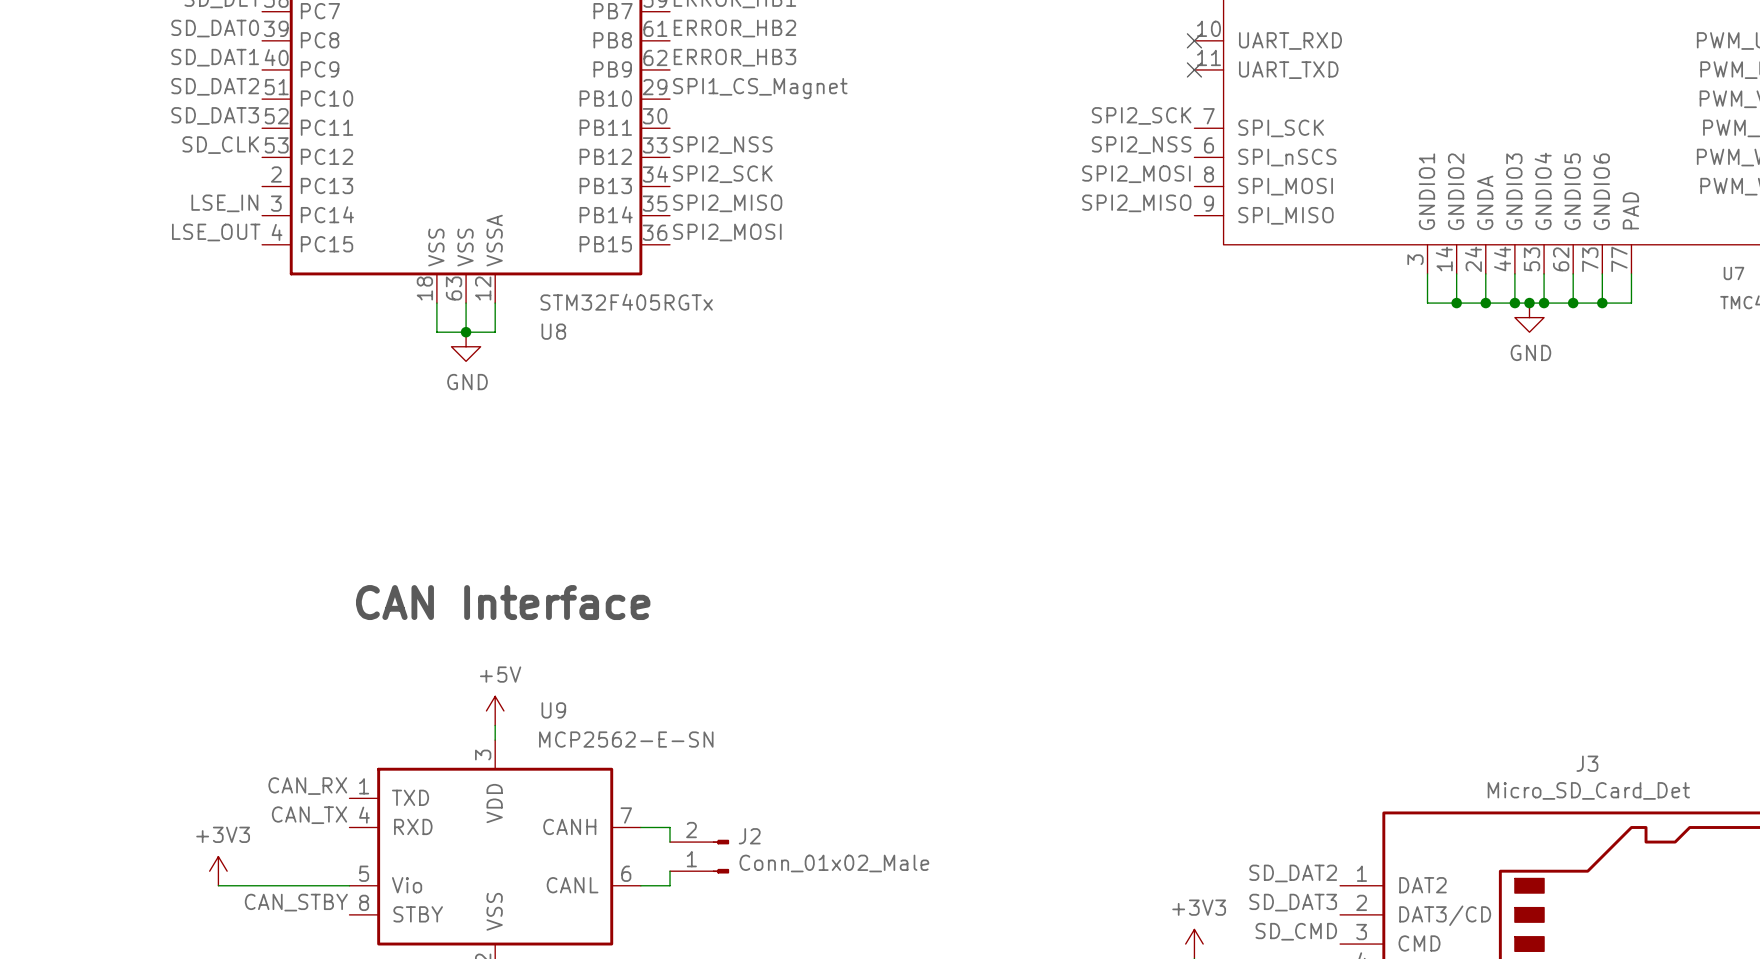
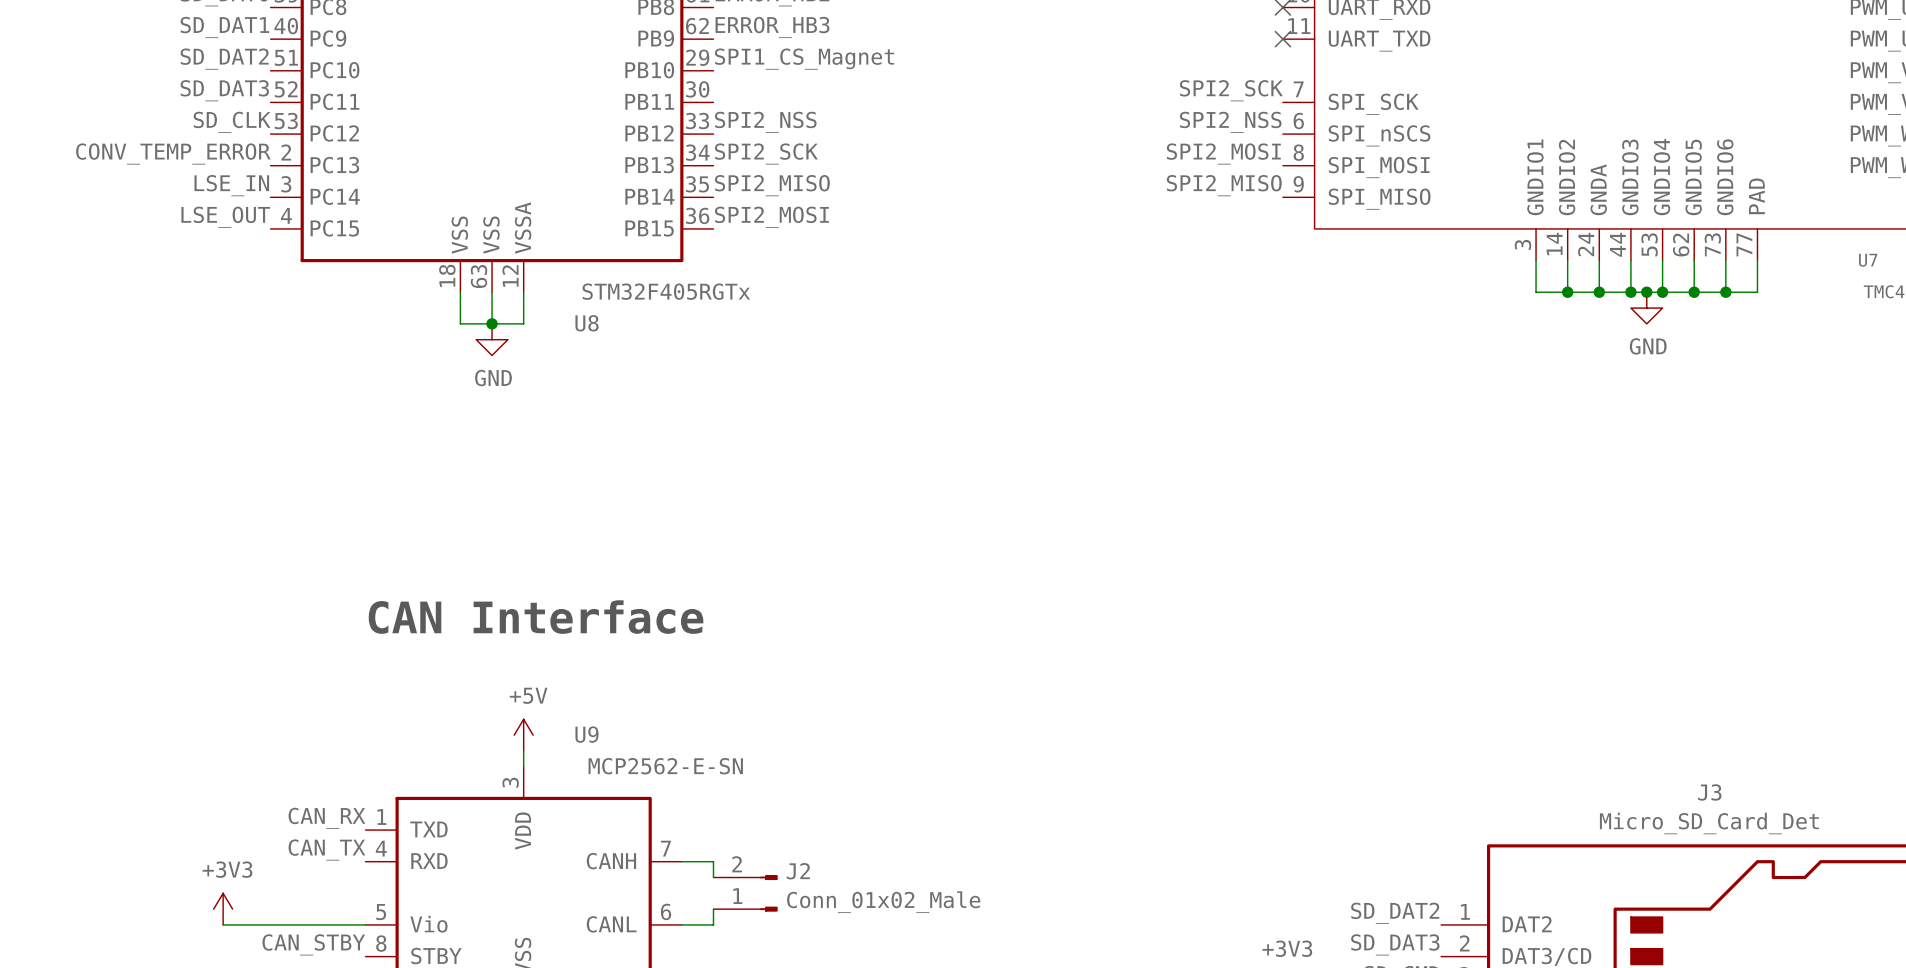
label: none -> CONV_TEMP_ERROR (173, 153)

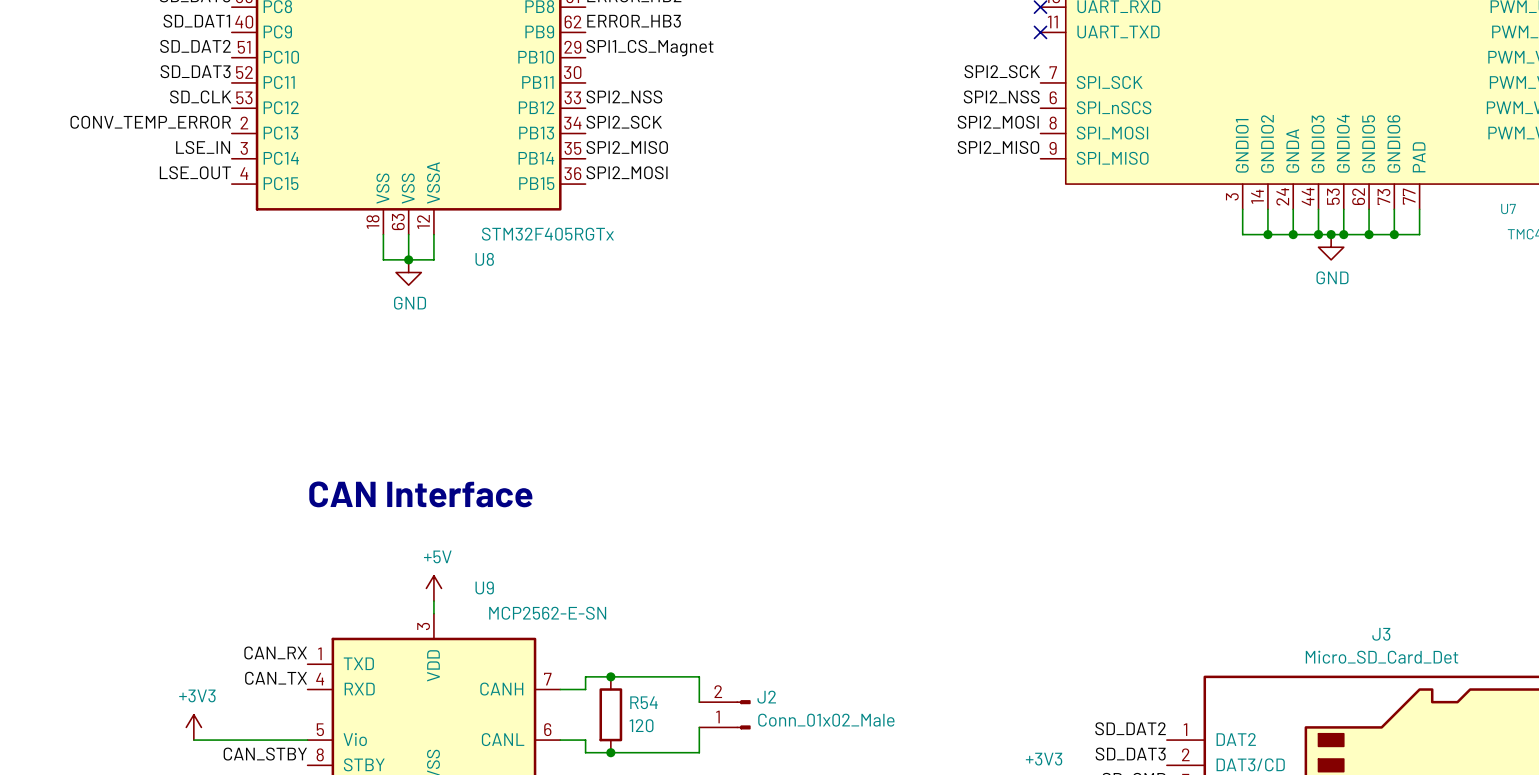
junction: none -> (610, 676)
wire: (713, 861) (713, 877) -> (585, 689) (585, 676) (699, 676) (699, 702)
J2 position: (745, 893) -> (724, 714)
R54: none -> 120 (610, 714)
wire: (713, 909) (713, 924) -> (699, 727) (699, 752) (585, 752) (585, 740)
junction: none -> (610, 752)

